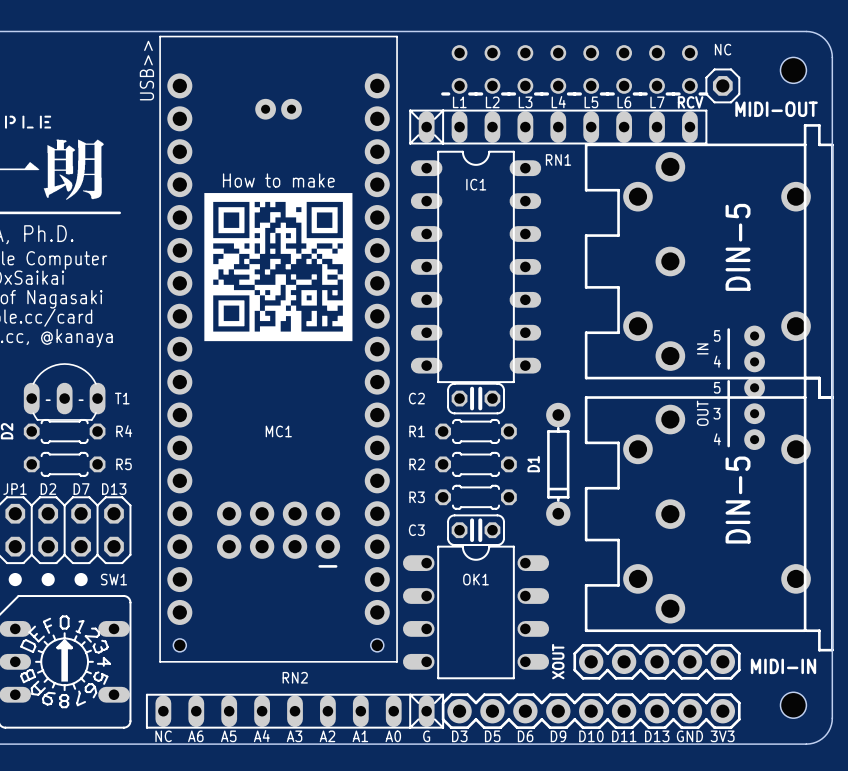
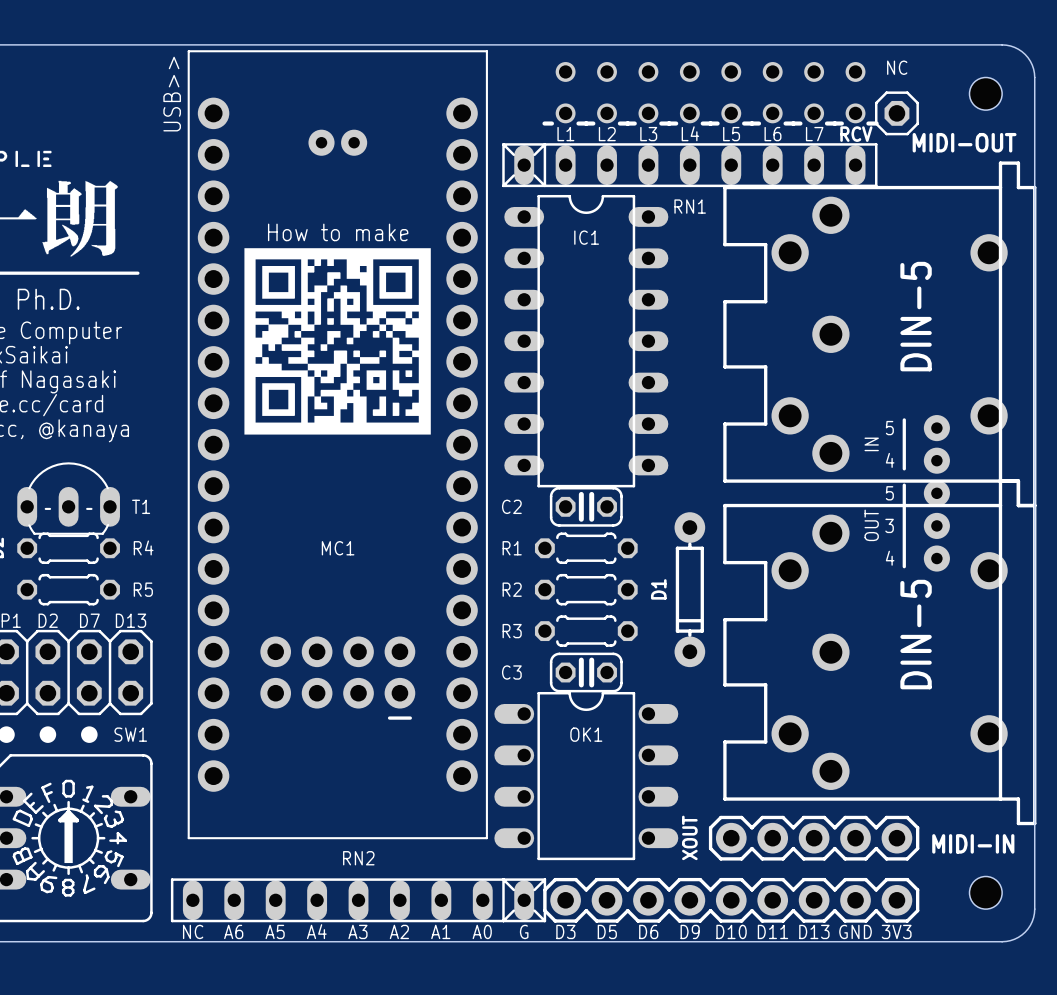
hole: (179, 645) -> none
hole: (377, 645) -> none

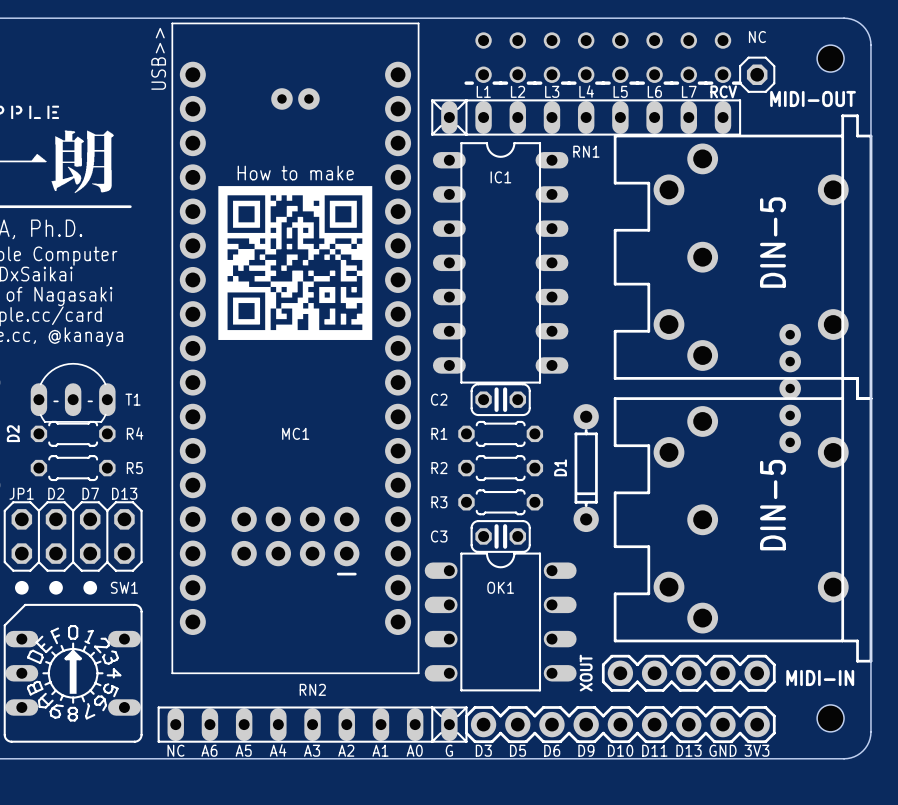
line: (904, 419) (904, 468) -> none
text: 5 (889, 428) -> none
text: IN (871, 444) -> none
text: 4 (890, 460) -> none
line: (904, 485) (904, 566) -> none
text: 5 (889, 493) -> none
text: OUT (871, 525) -> none
text: 3 (889, 525) -> none
text: 4 (890, 558) -> none

